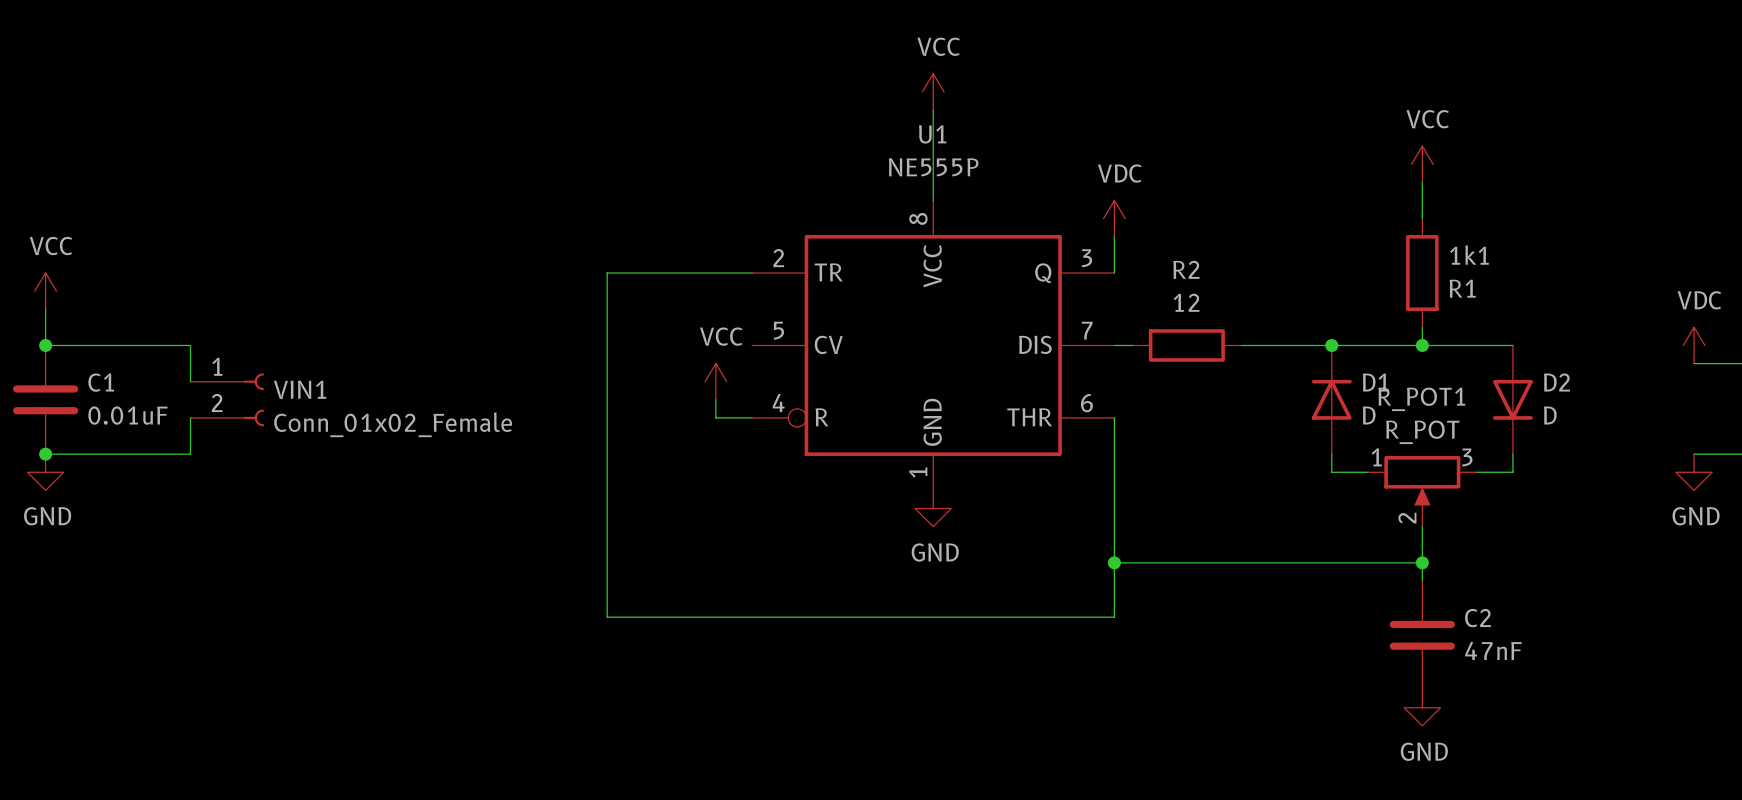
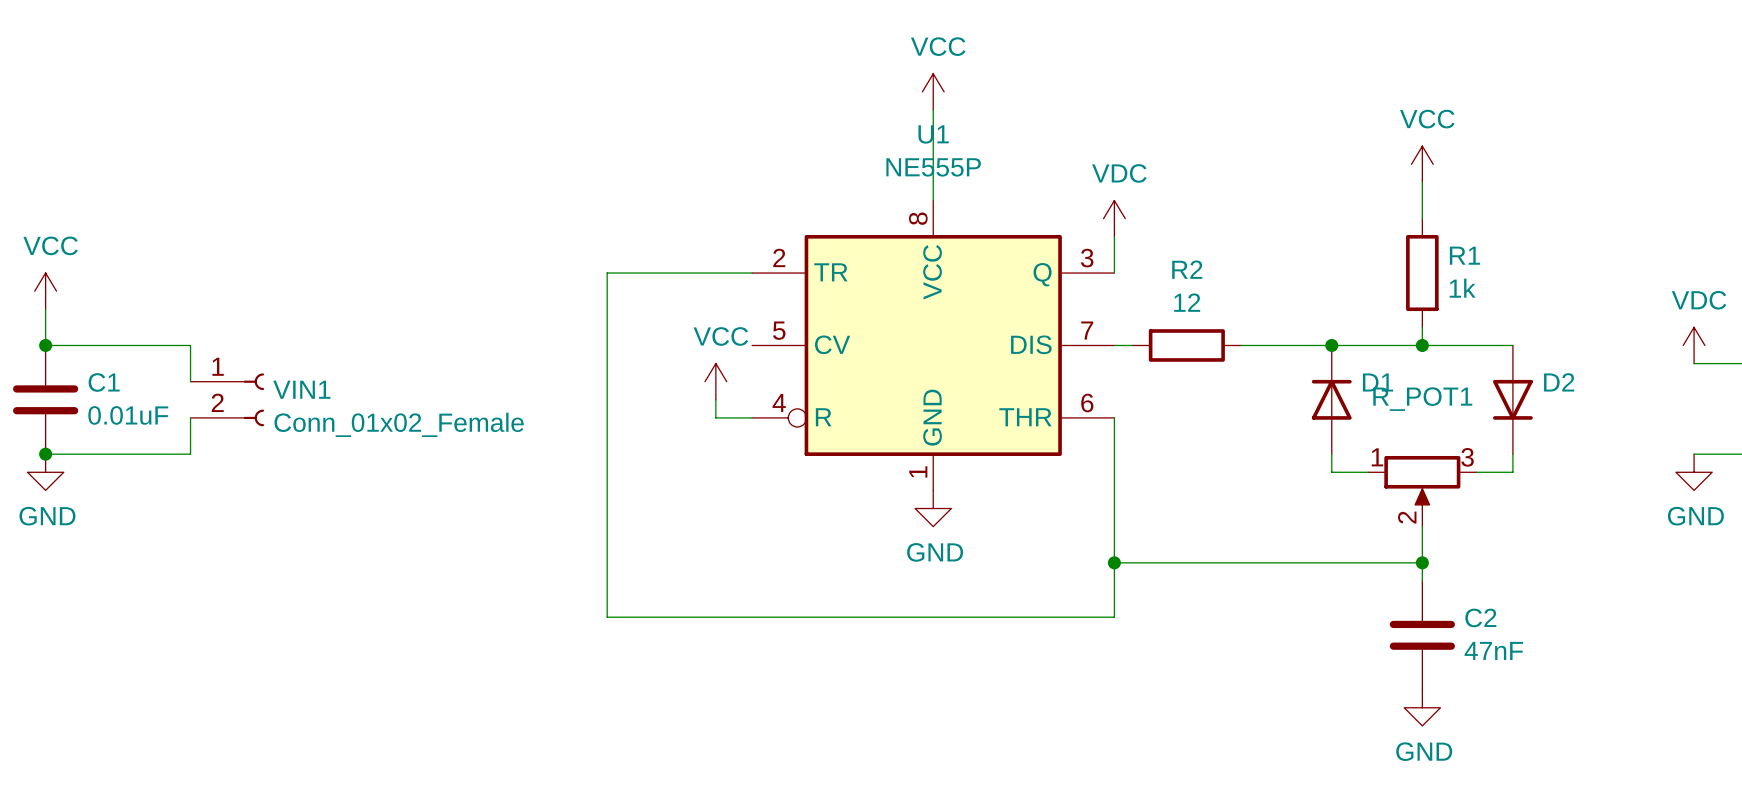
1k1 name: 1k1 (1469, 255) -> R1 (1464, 255)
1k1 value: R1 (1462, 288) -> 1k (1462, 288)
D1 value: D (1369, 415) -> none
D2 value: D (1550, 415) -> none
R_POT1 value: R_POT (1422, 432) -> none

